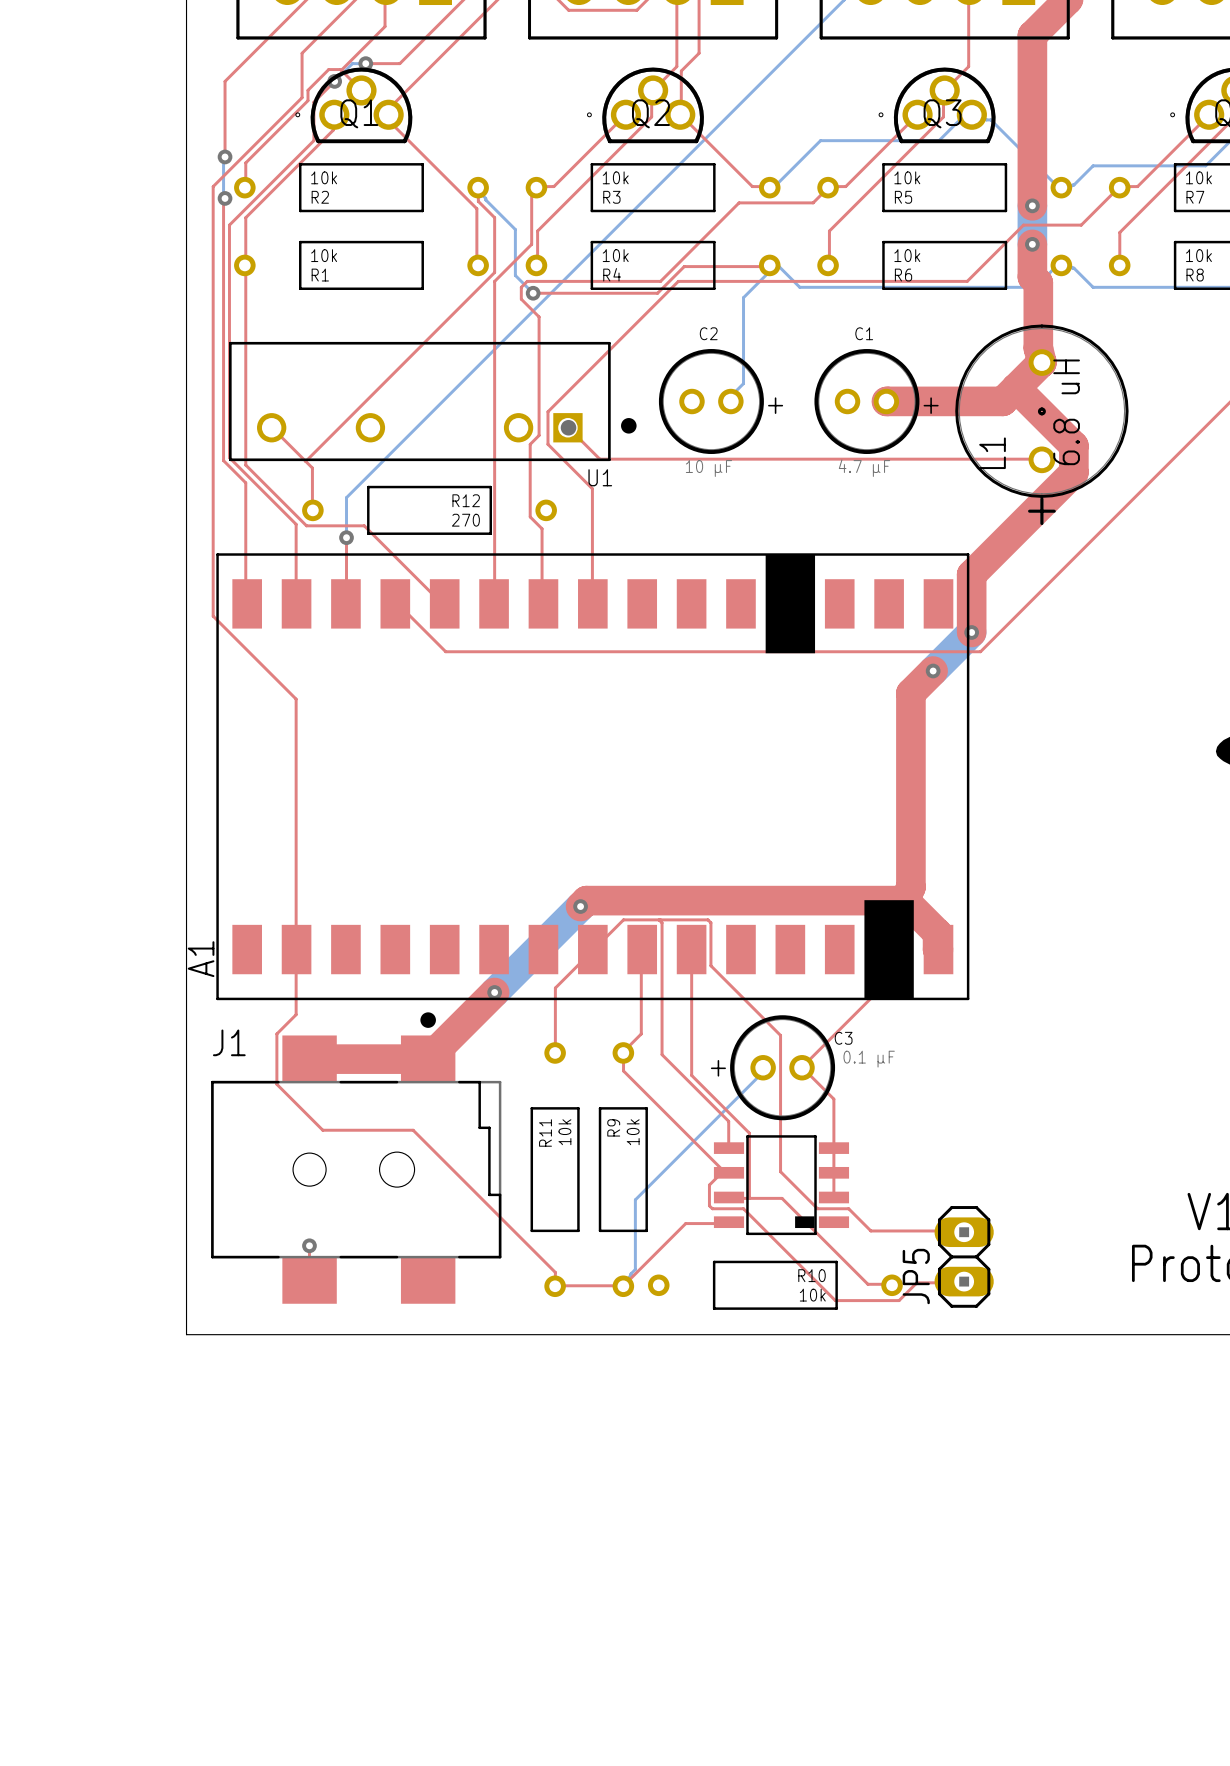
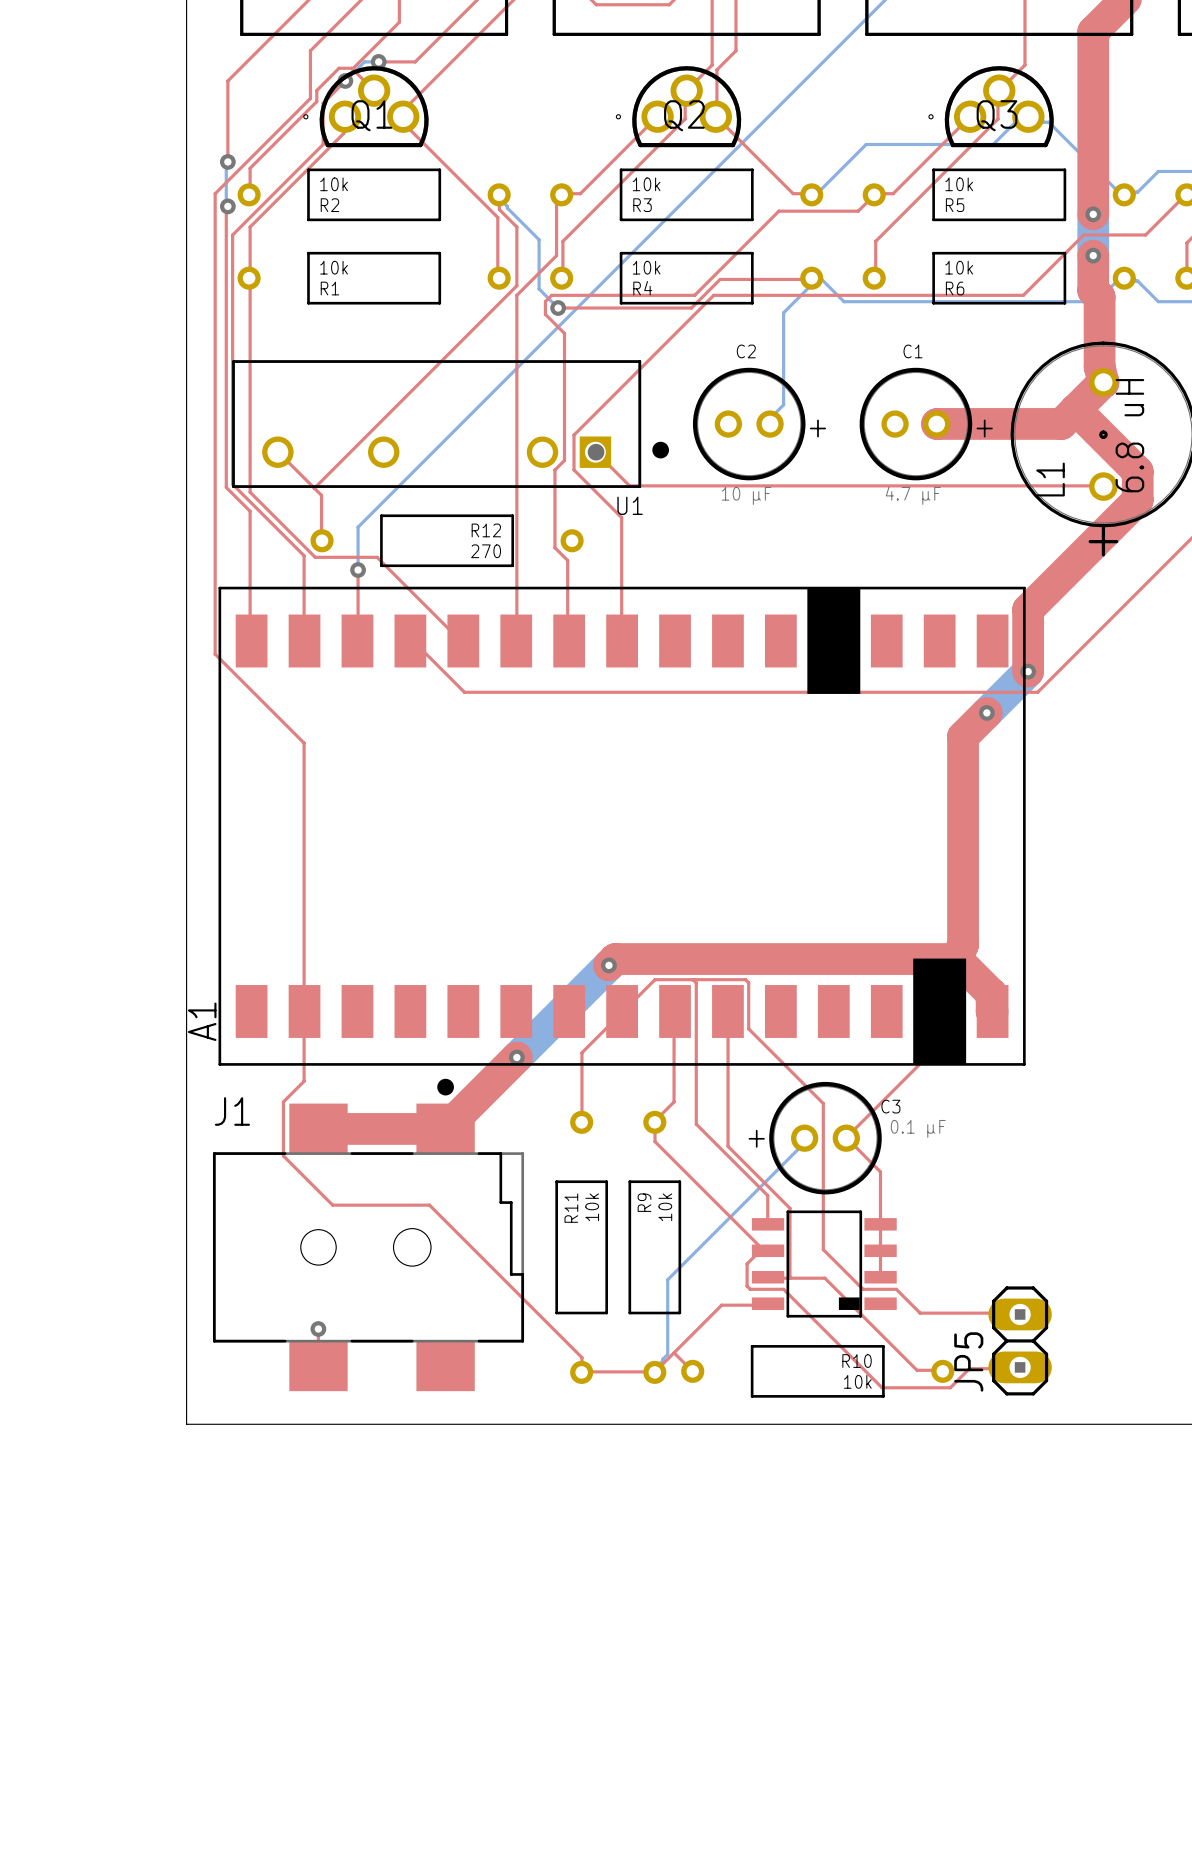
top track: none -> (674, 1352) (692, 1371)

